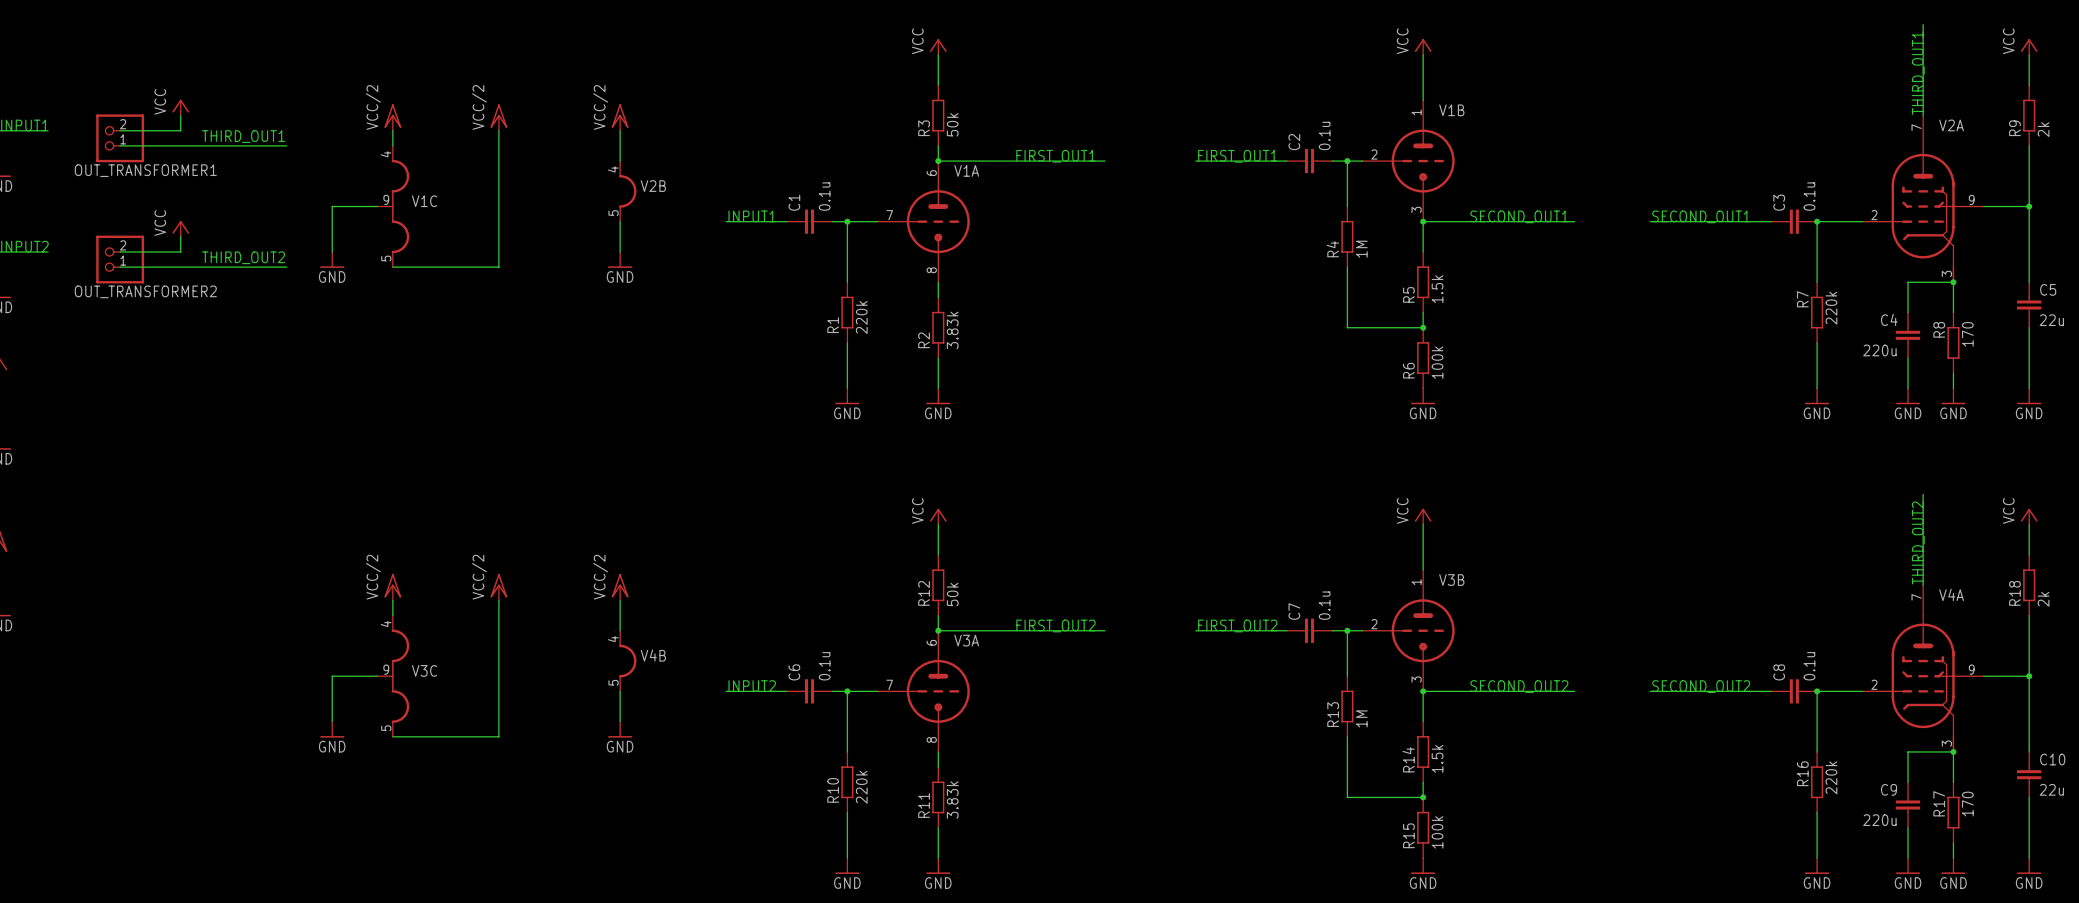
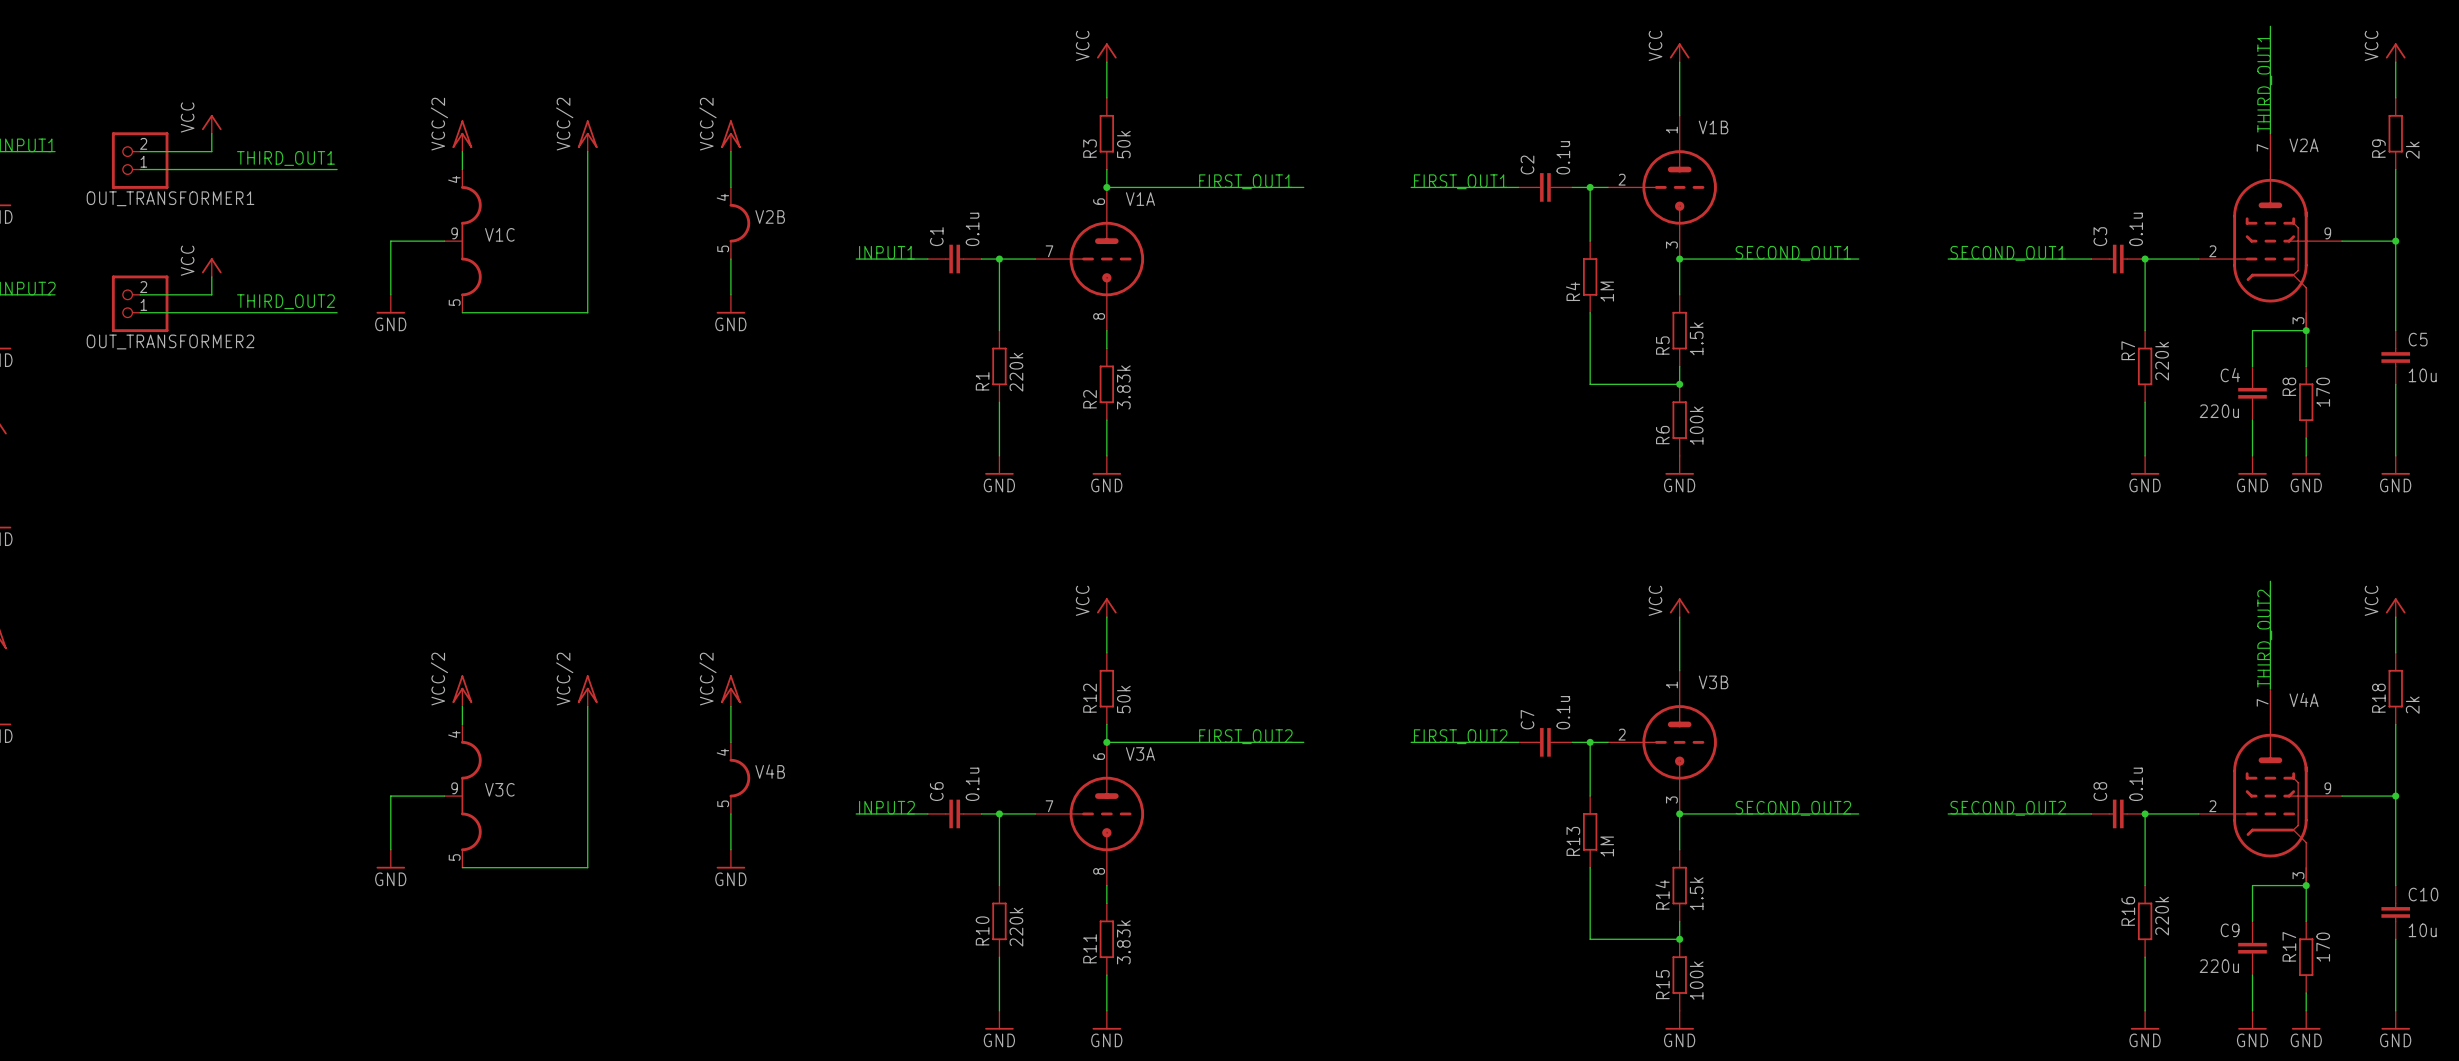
C5 value: 22u (2051, 320) -> 10u (2422, 375)
C10 value: 22u (2051, 789) -> 10u (2422, 930)

